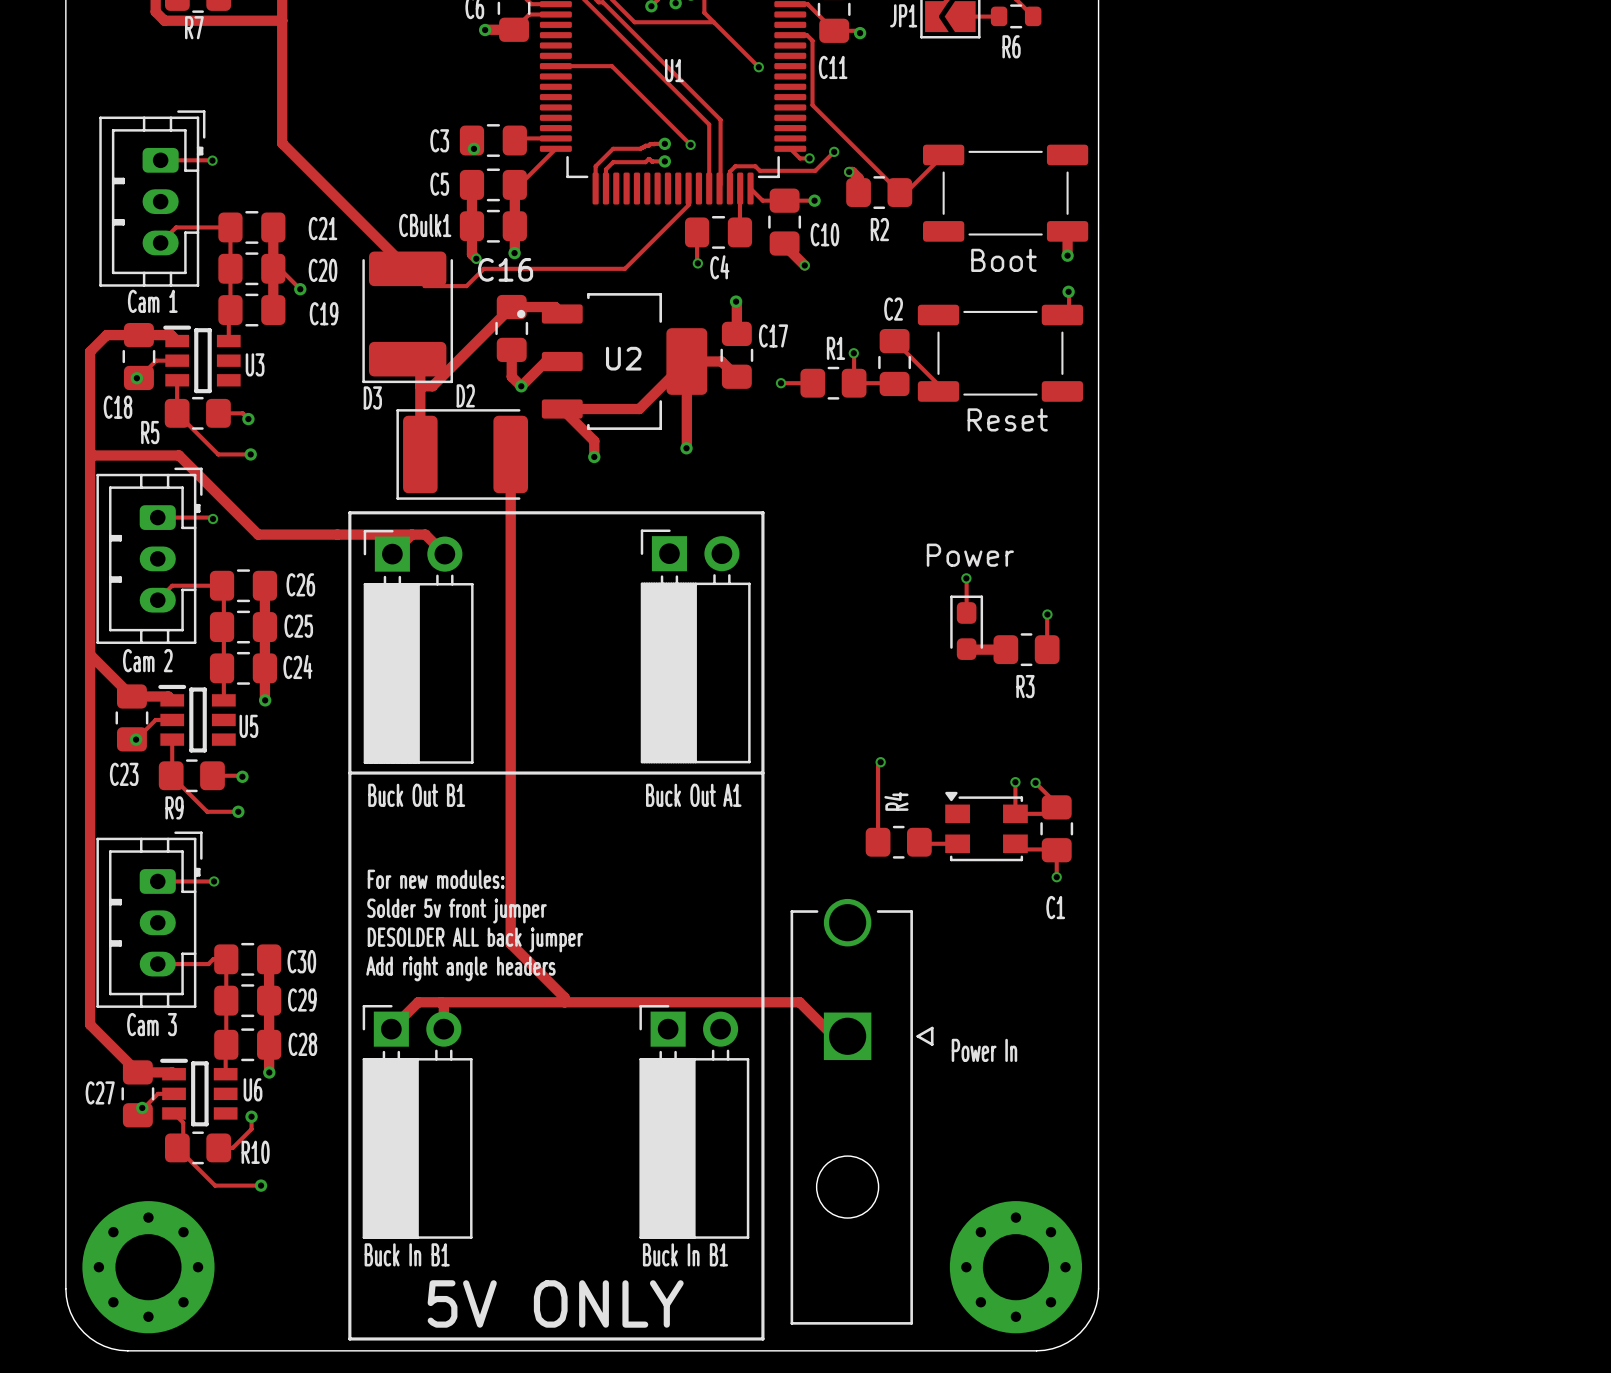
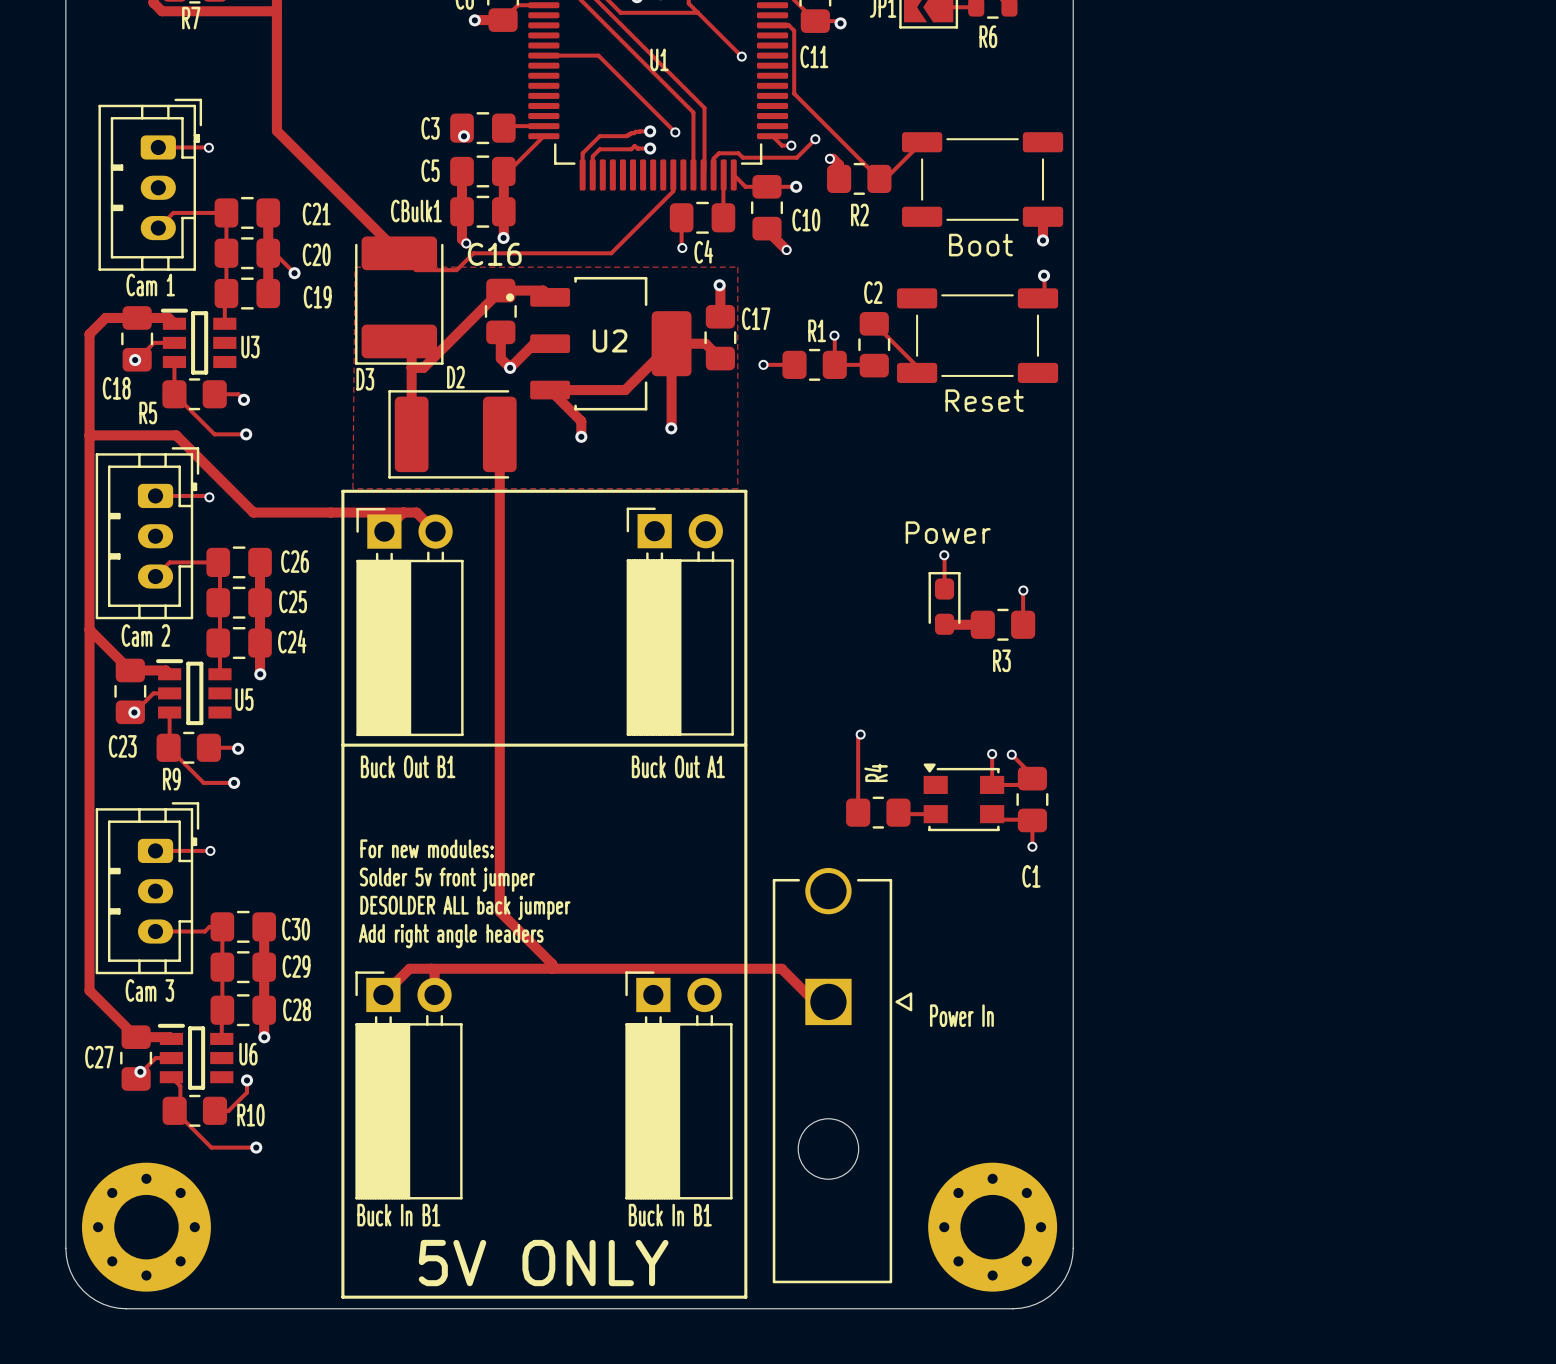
zone outline: none -> (354, 267) (737, 267) (737, 488) (352, 488) (354, 267)

